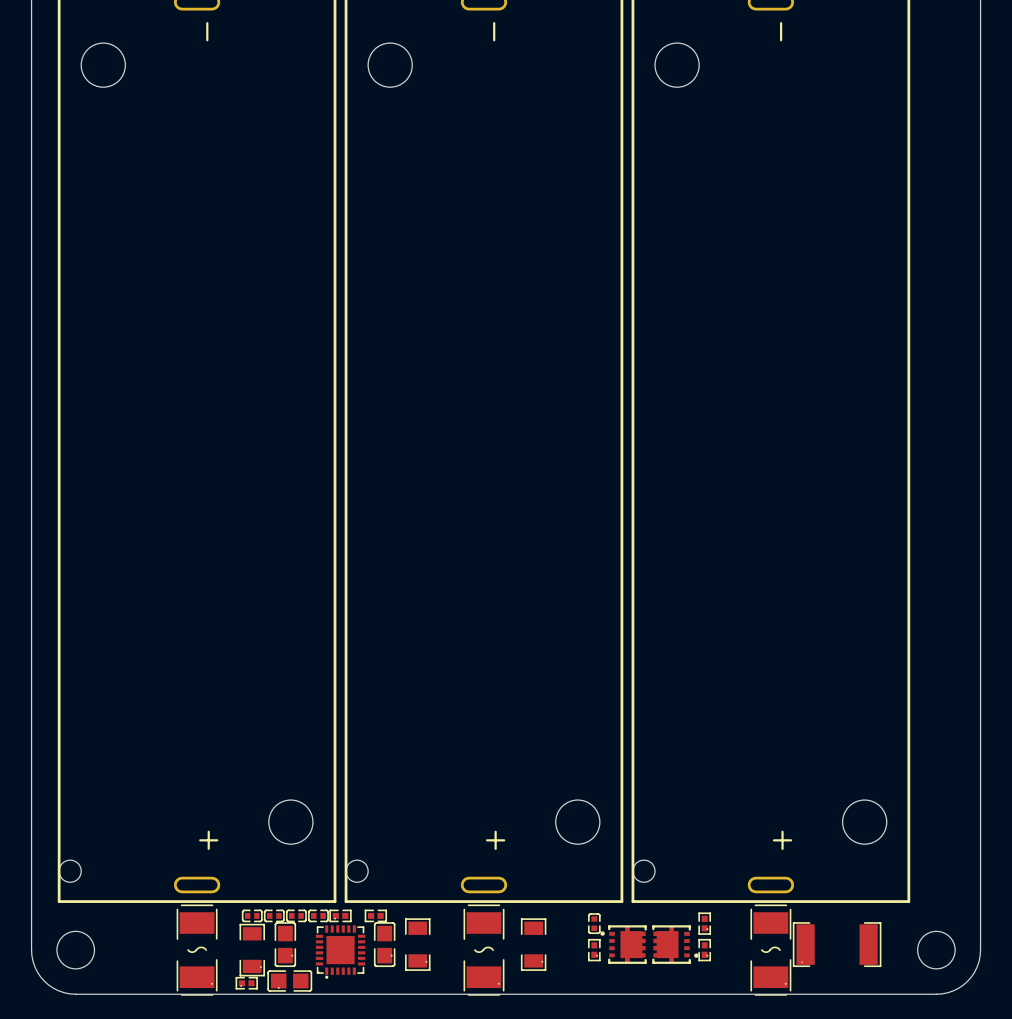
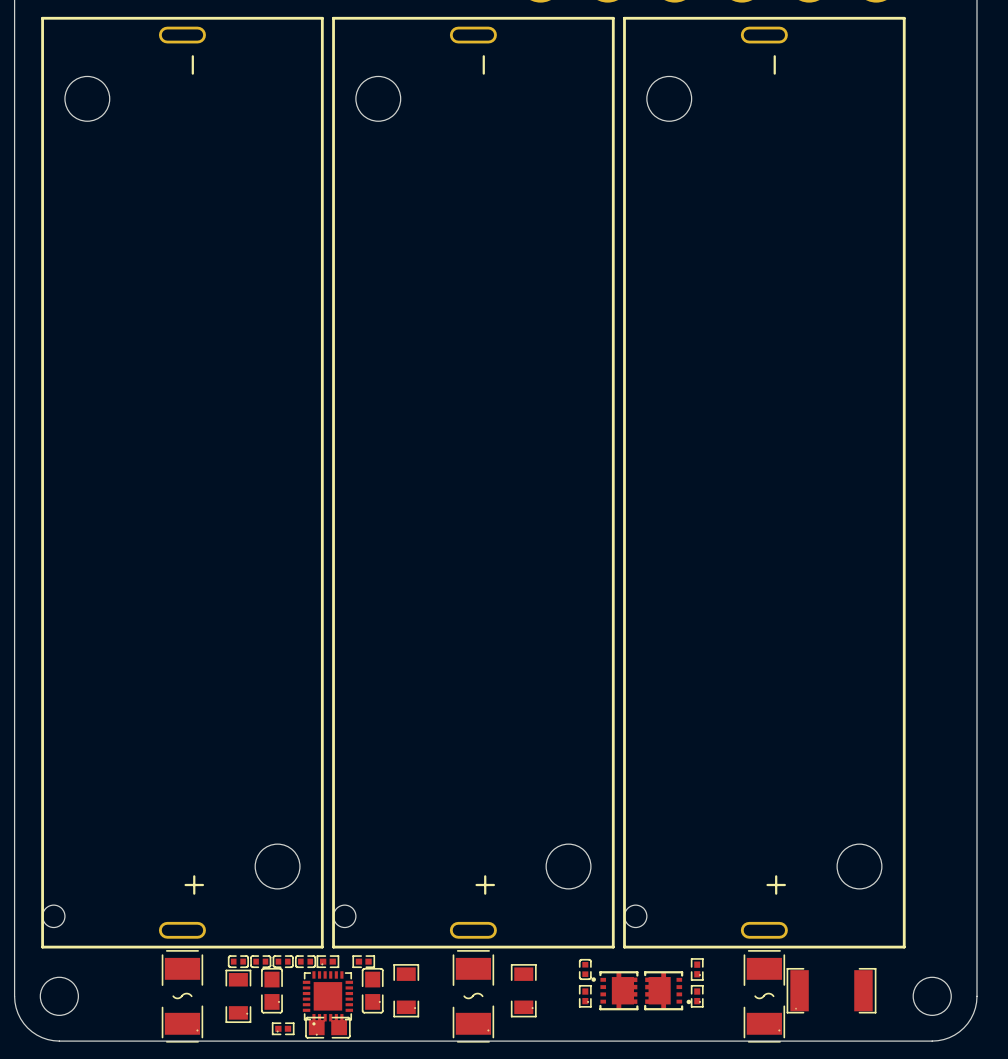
part footprint: [267, 970, 313, 992] -> [271, 1022, 295, 1036]
part: none -> (327, 1027)
part: (246, 983) -> none

